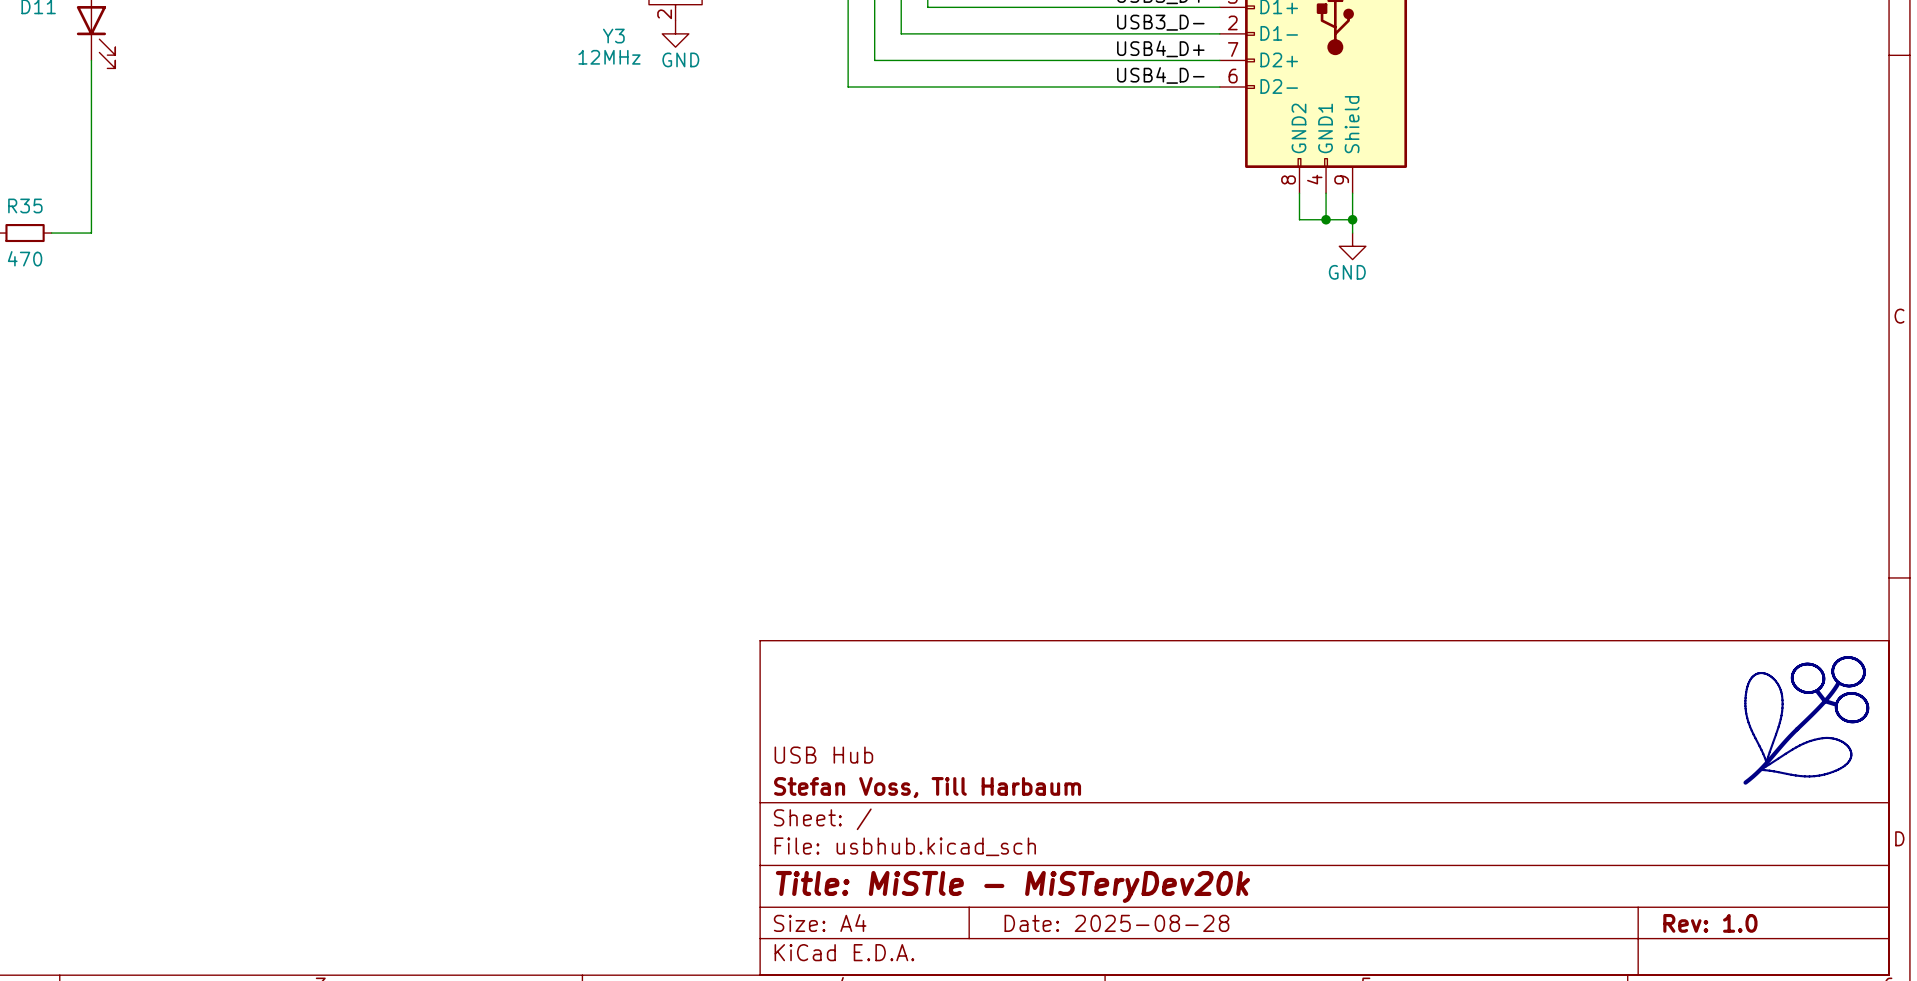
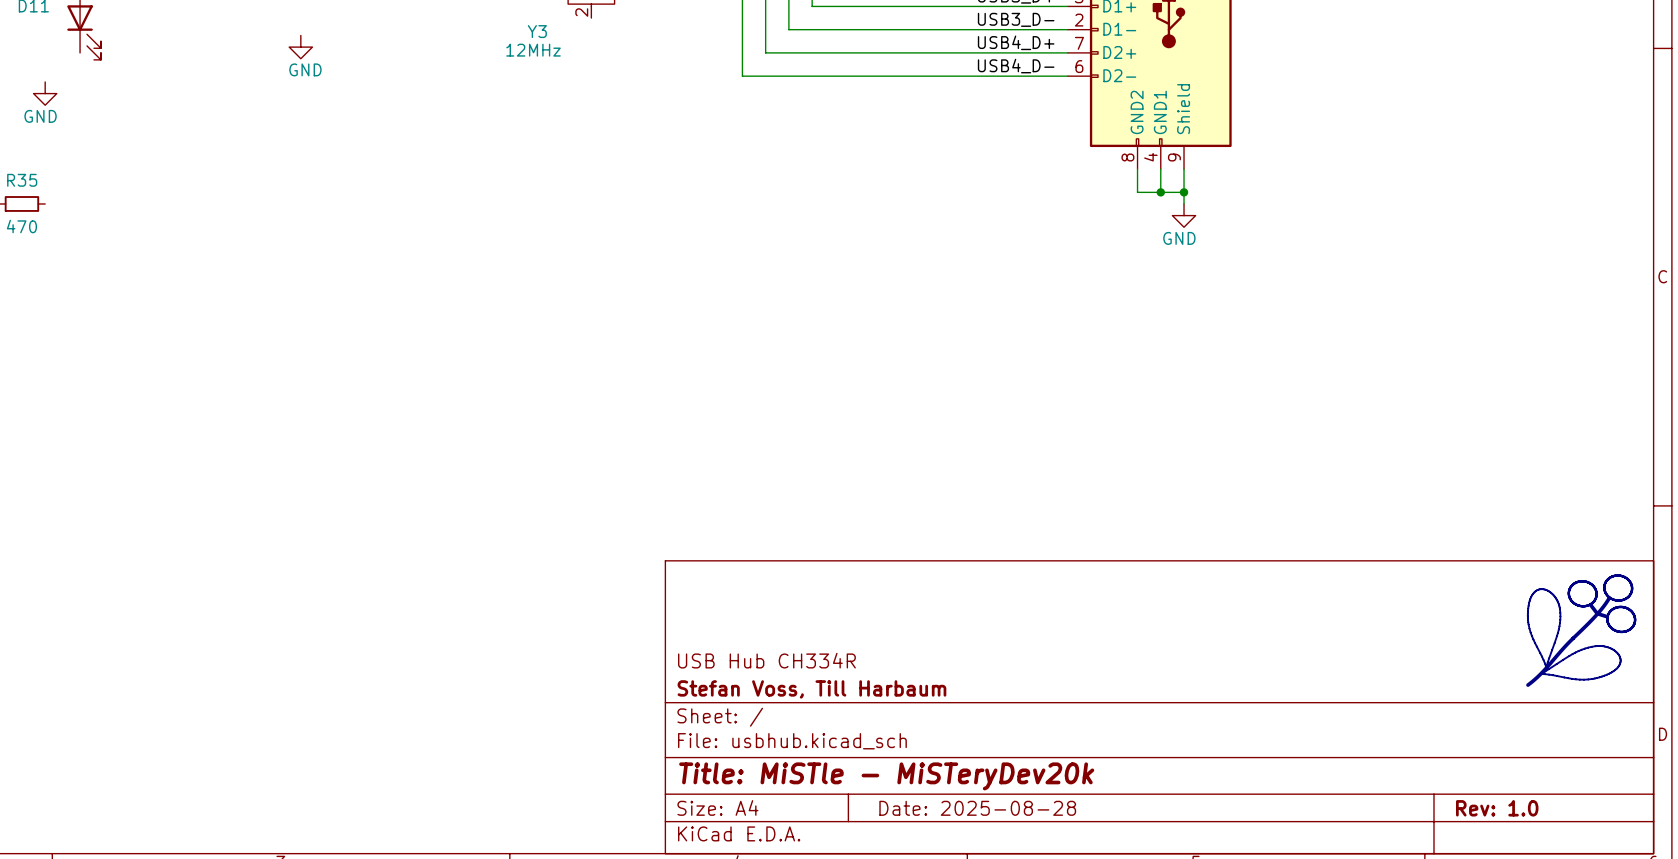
power symbol: GND (675, 33) -> none
power symbol: none -> GND (300, 47)
wire: (91, 60) (91, 233) (51, 233) -> none
power symbol: none -> GND (45, 93)
title block: USB Hub (823, 755) -> USB Hub CH334R (766, 660)

